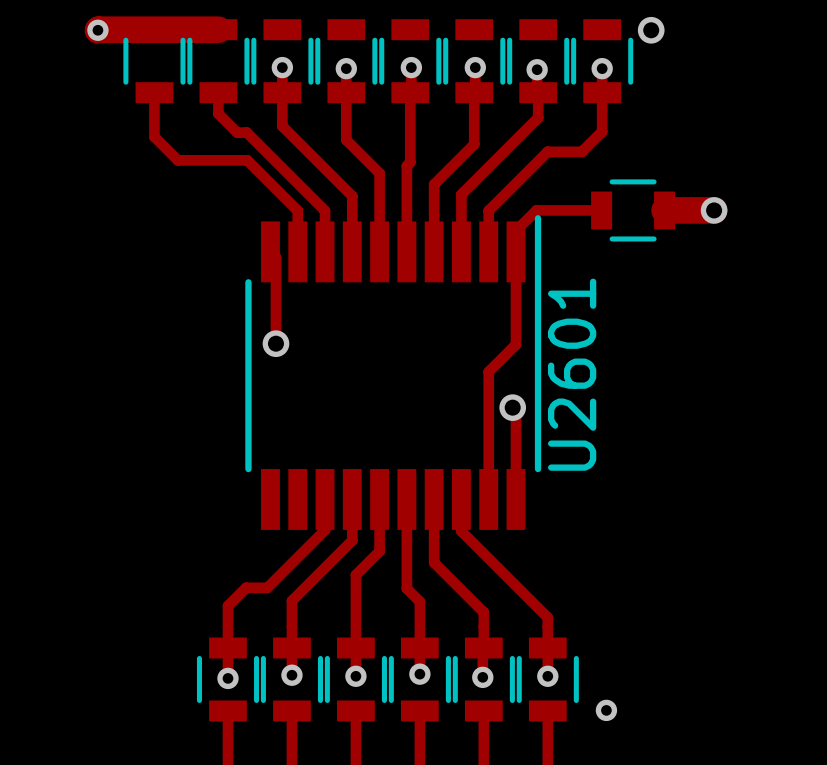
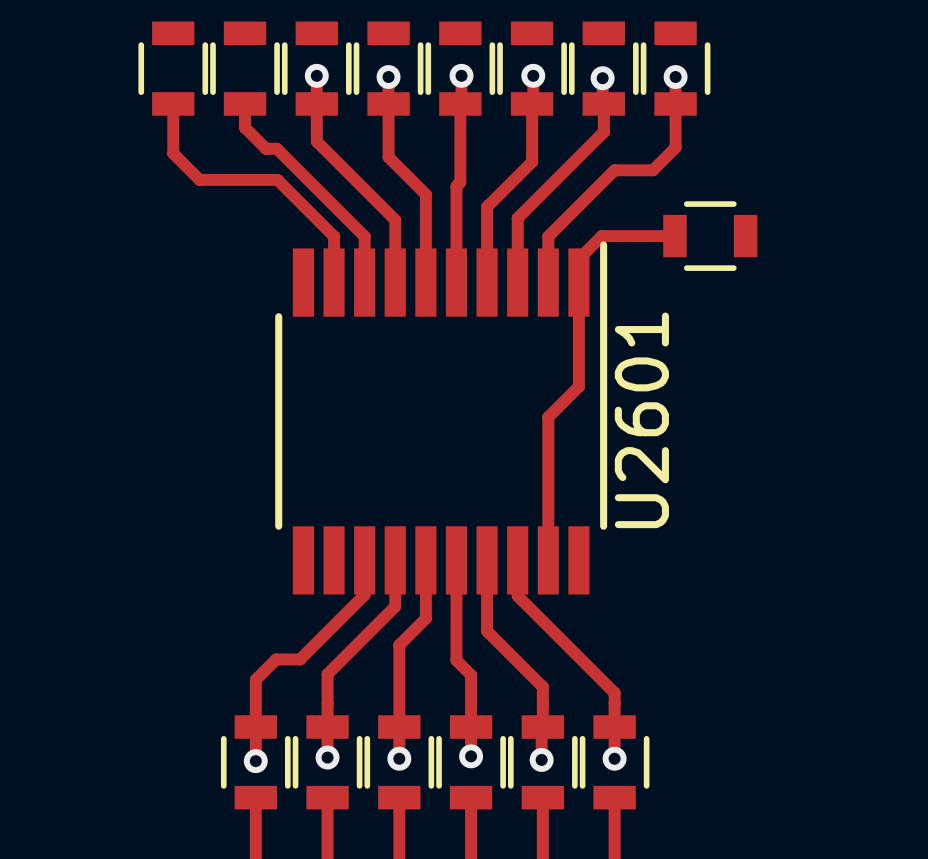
track: (98, 29) (218, 29) -> none
via: (97, 30) -> none
via: (651, 30) -> none
track: (664, 210) (714, 210) -> none
via: (714, 210) -> none
track: (270, 251) (275, 257) (275, 343) -> none
via: (275, 343) -> none
track: (512, 407) (515, 410) (515, 499) -> none
via: (512, 407) -> none
via: (606, 710) -> none

